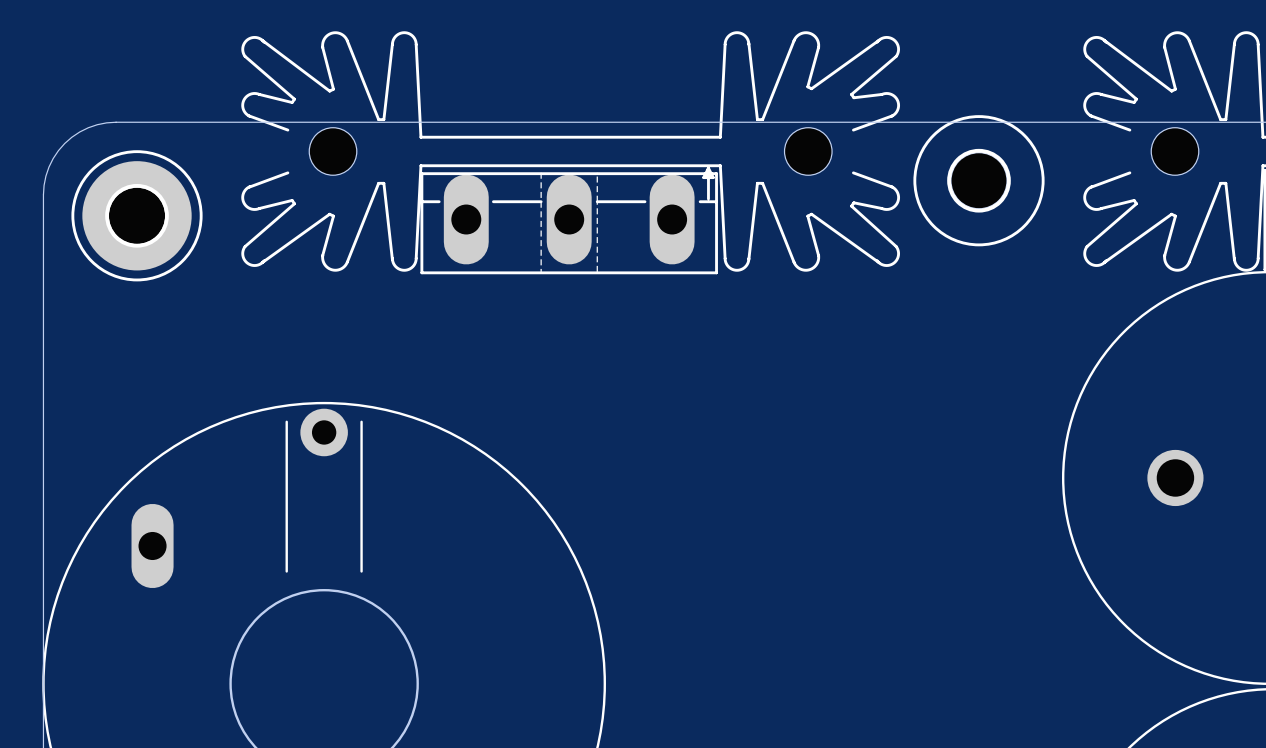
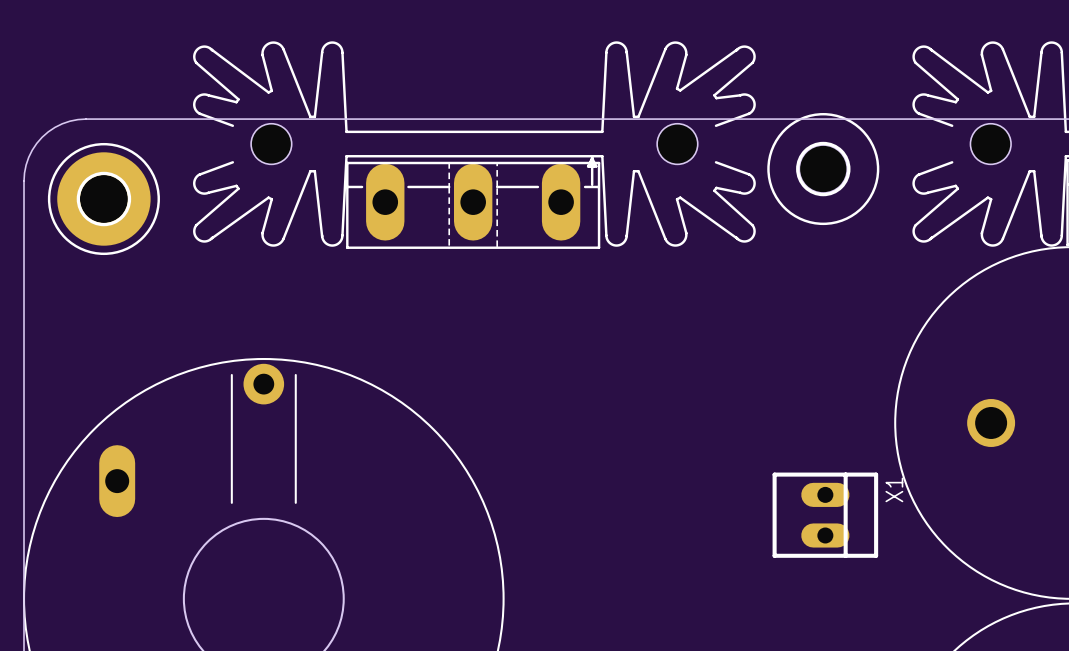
X1: none -> (825, 515)

